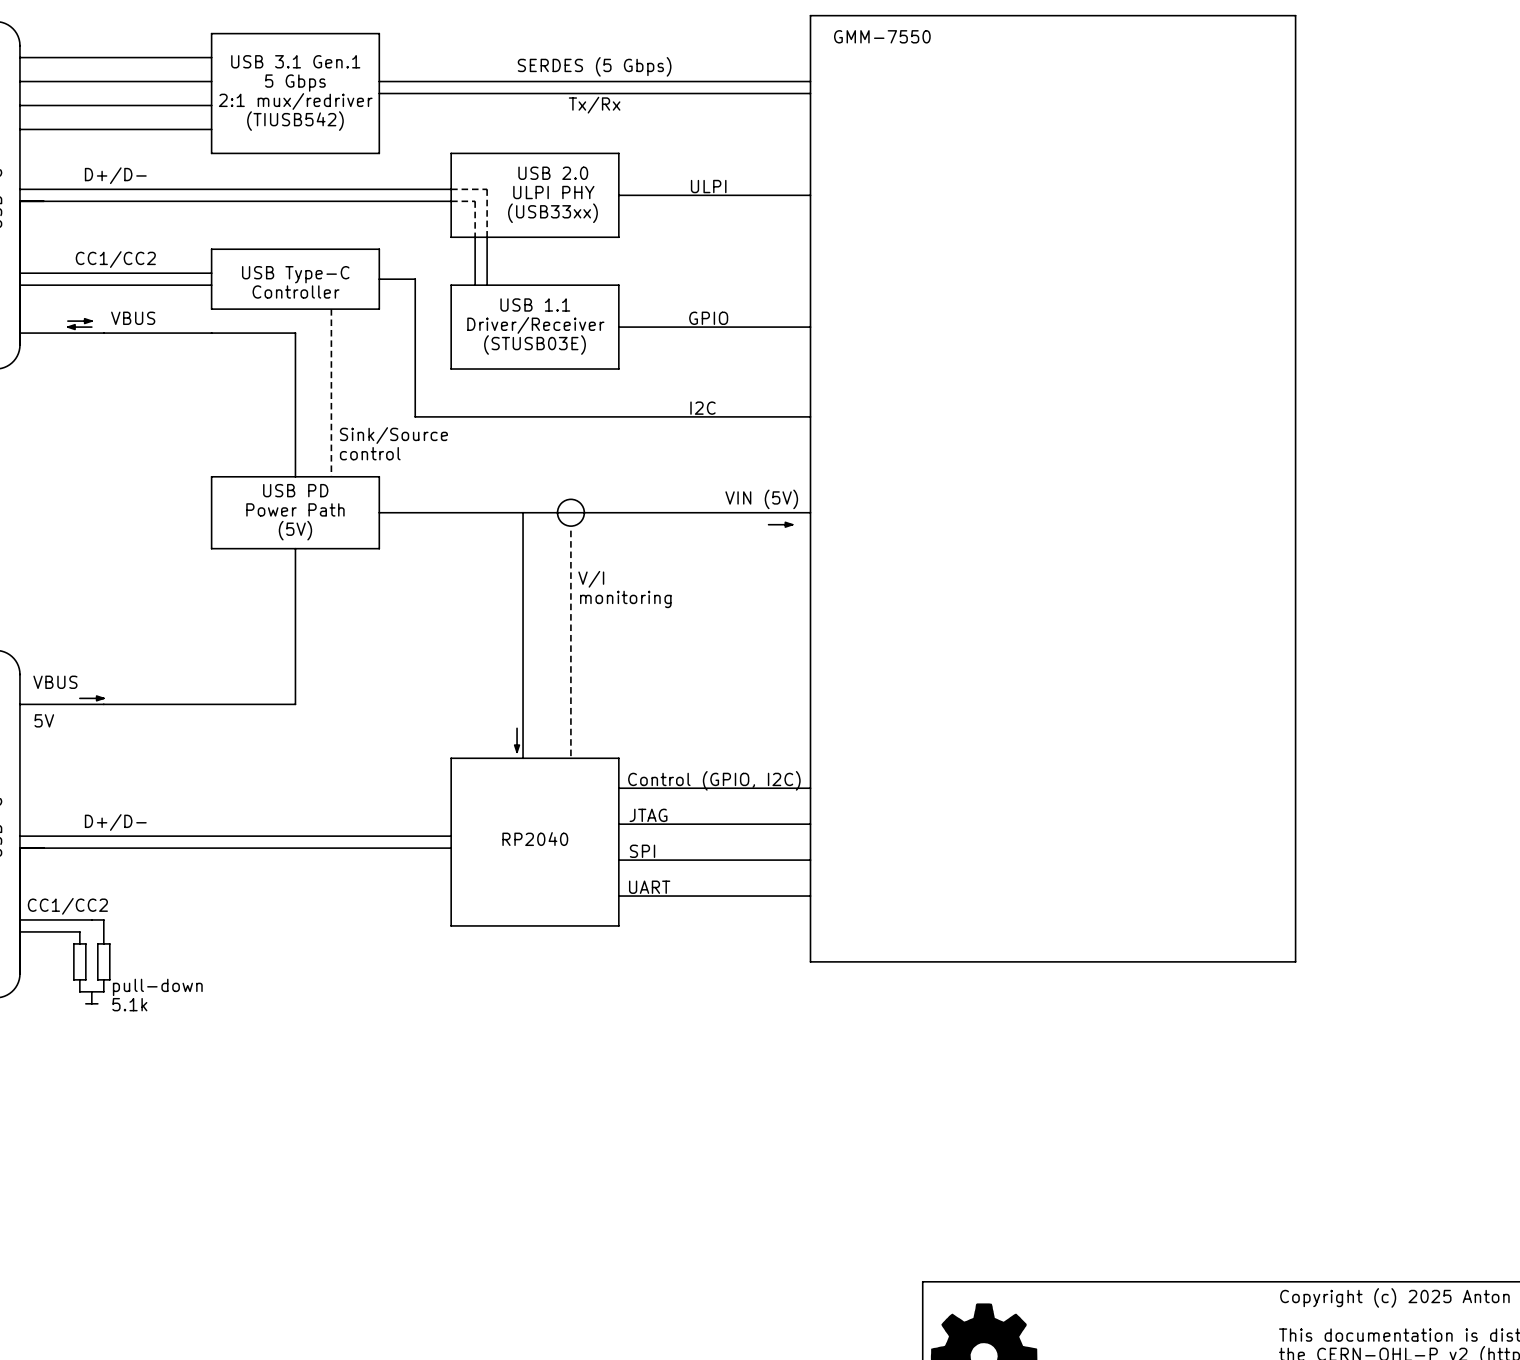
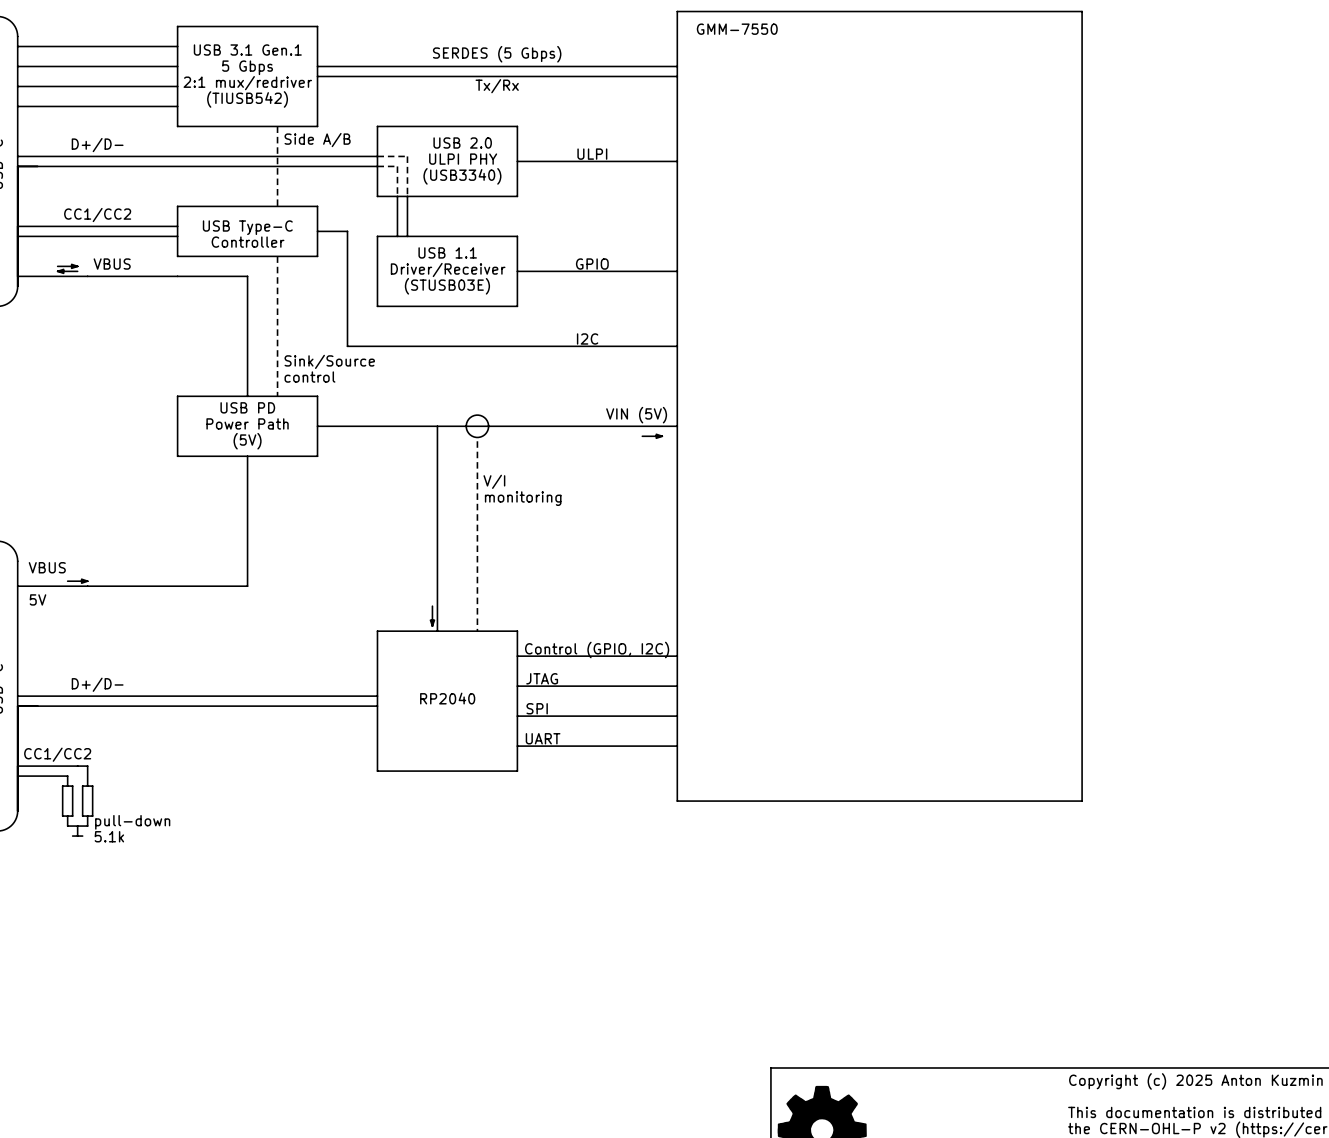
line: none -> (277, 126) (277, 206)
text: none -> Side A/B (317, 140)
text: (USB33xx) (552, 213) -> (USB3340) (462, 176)

